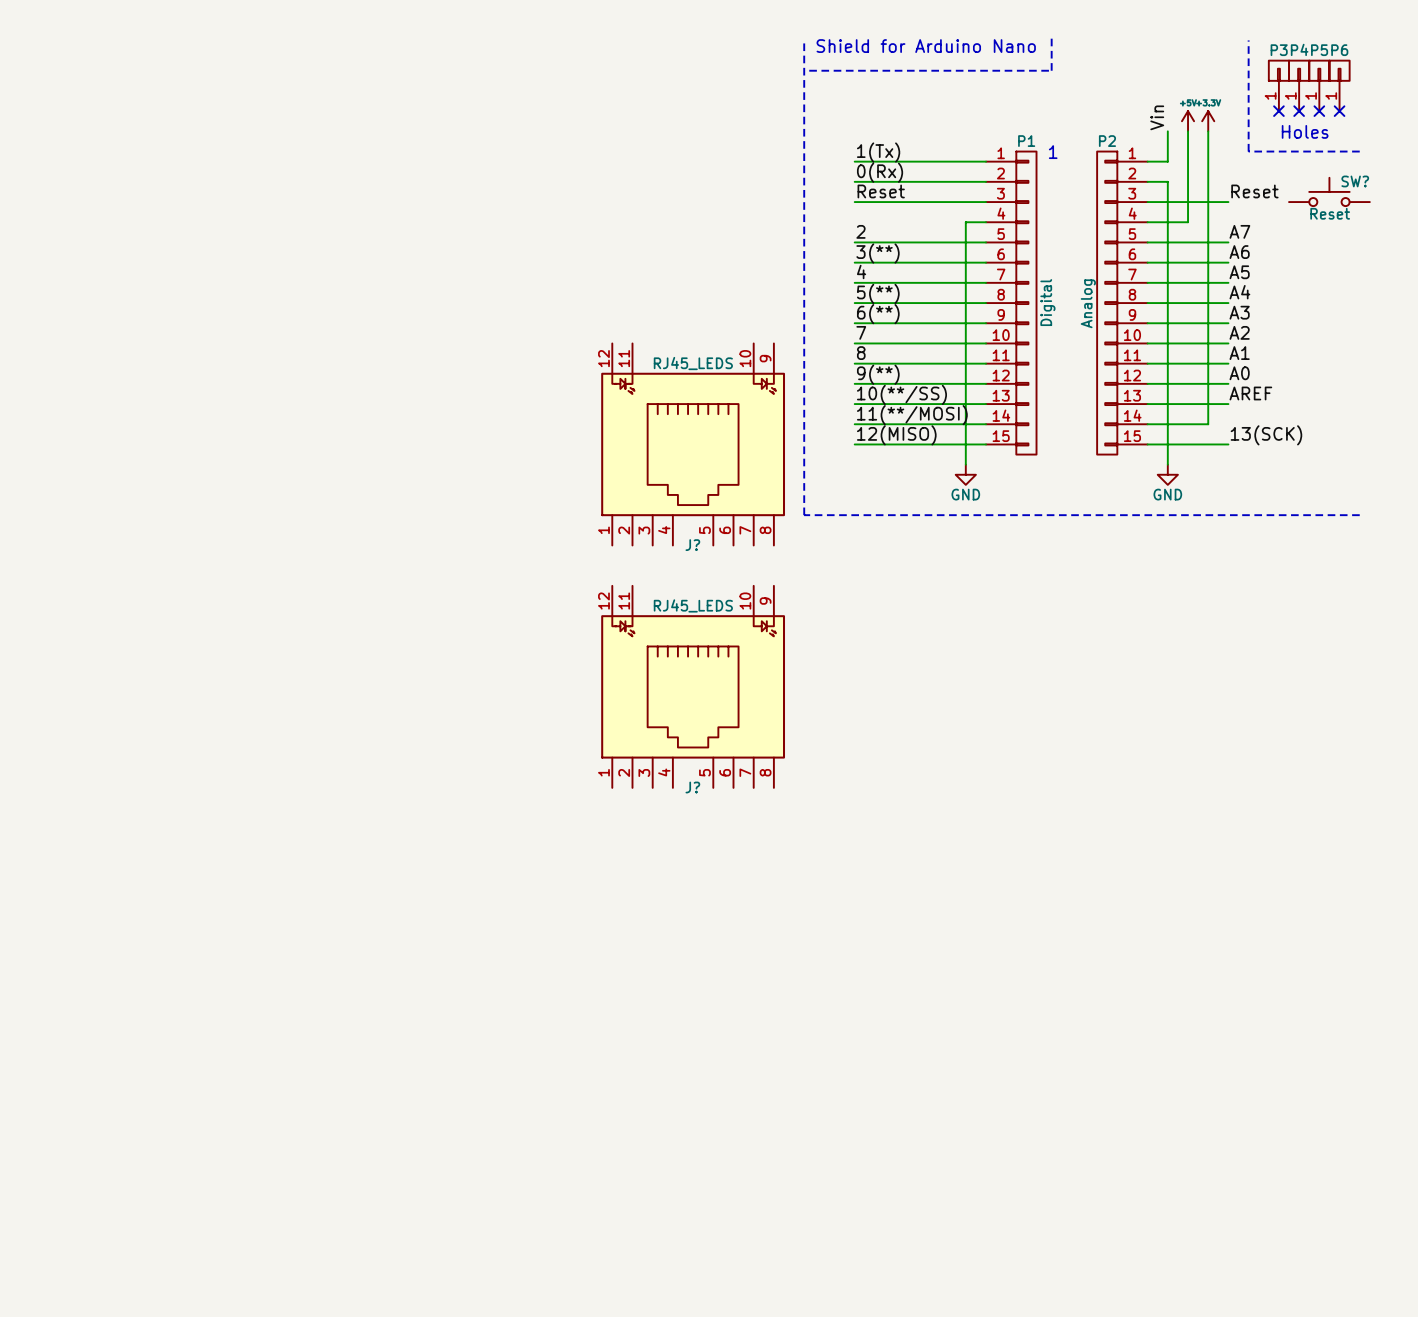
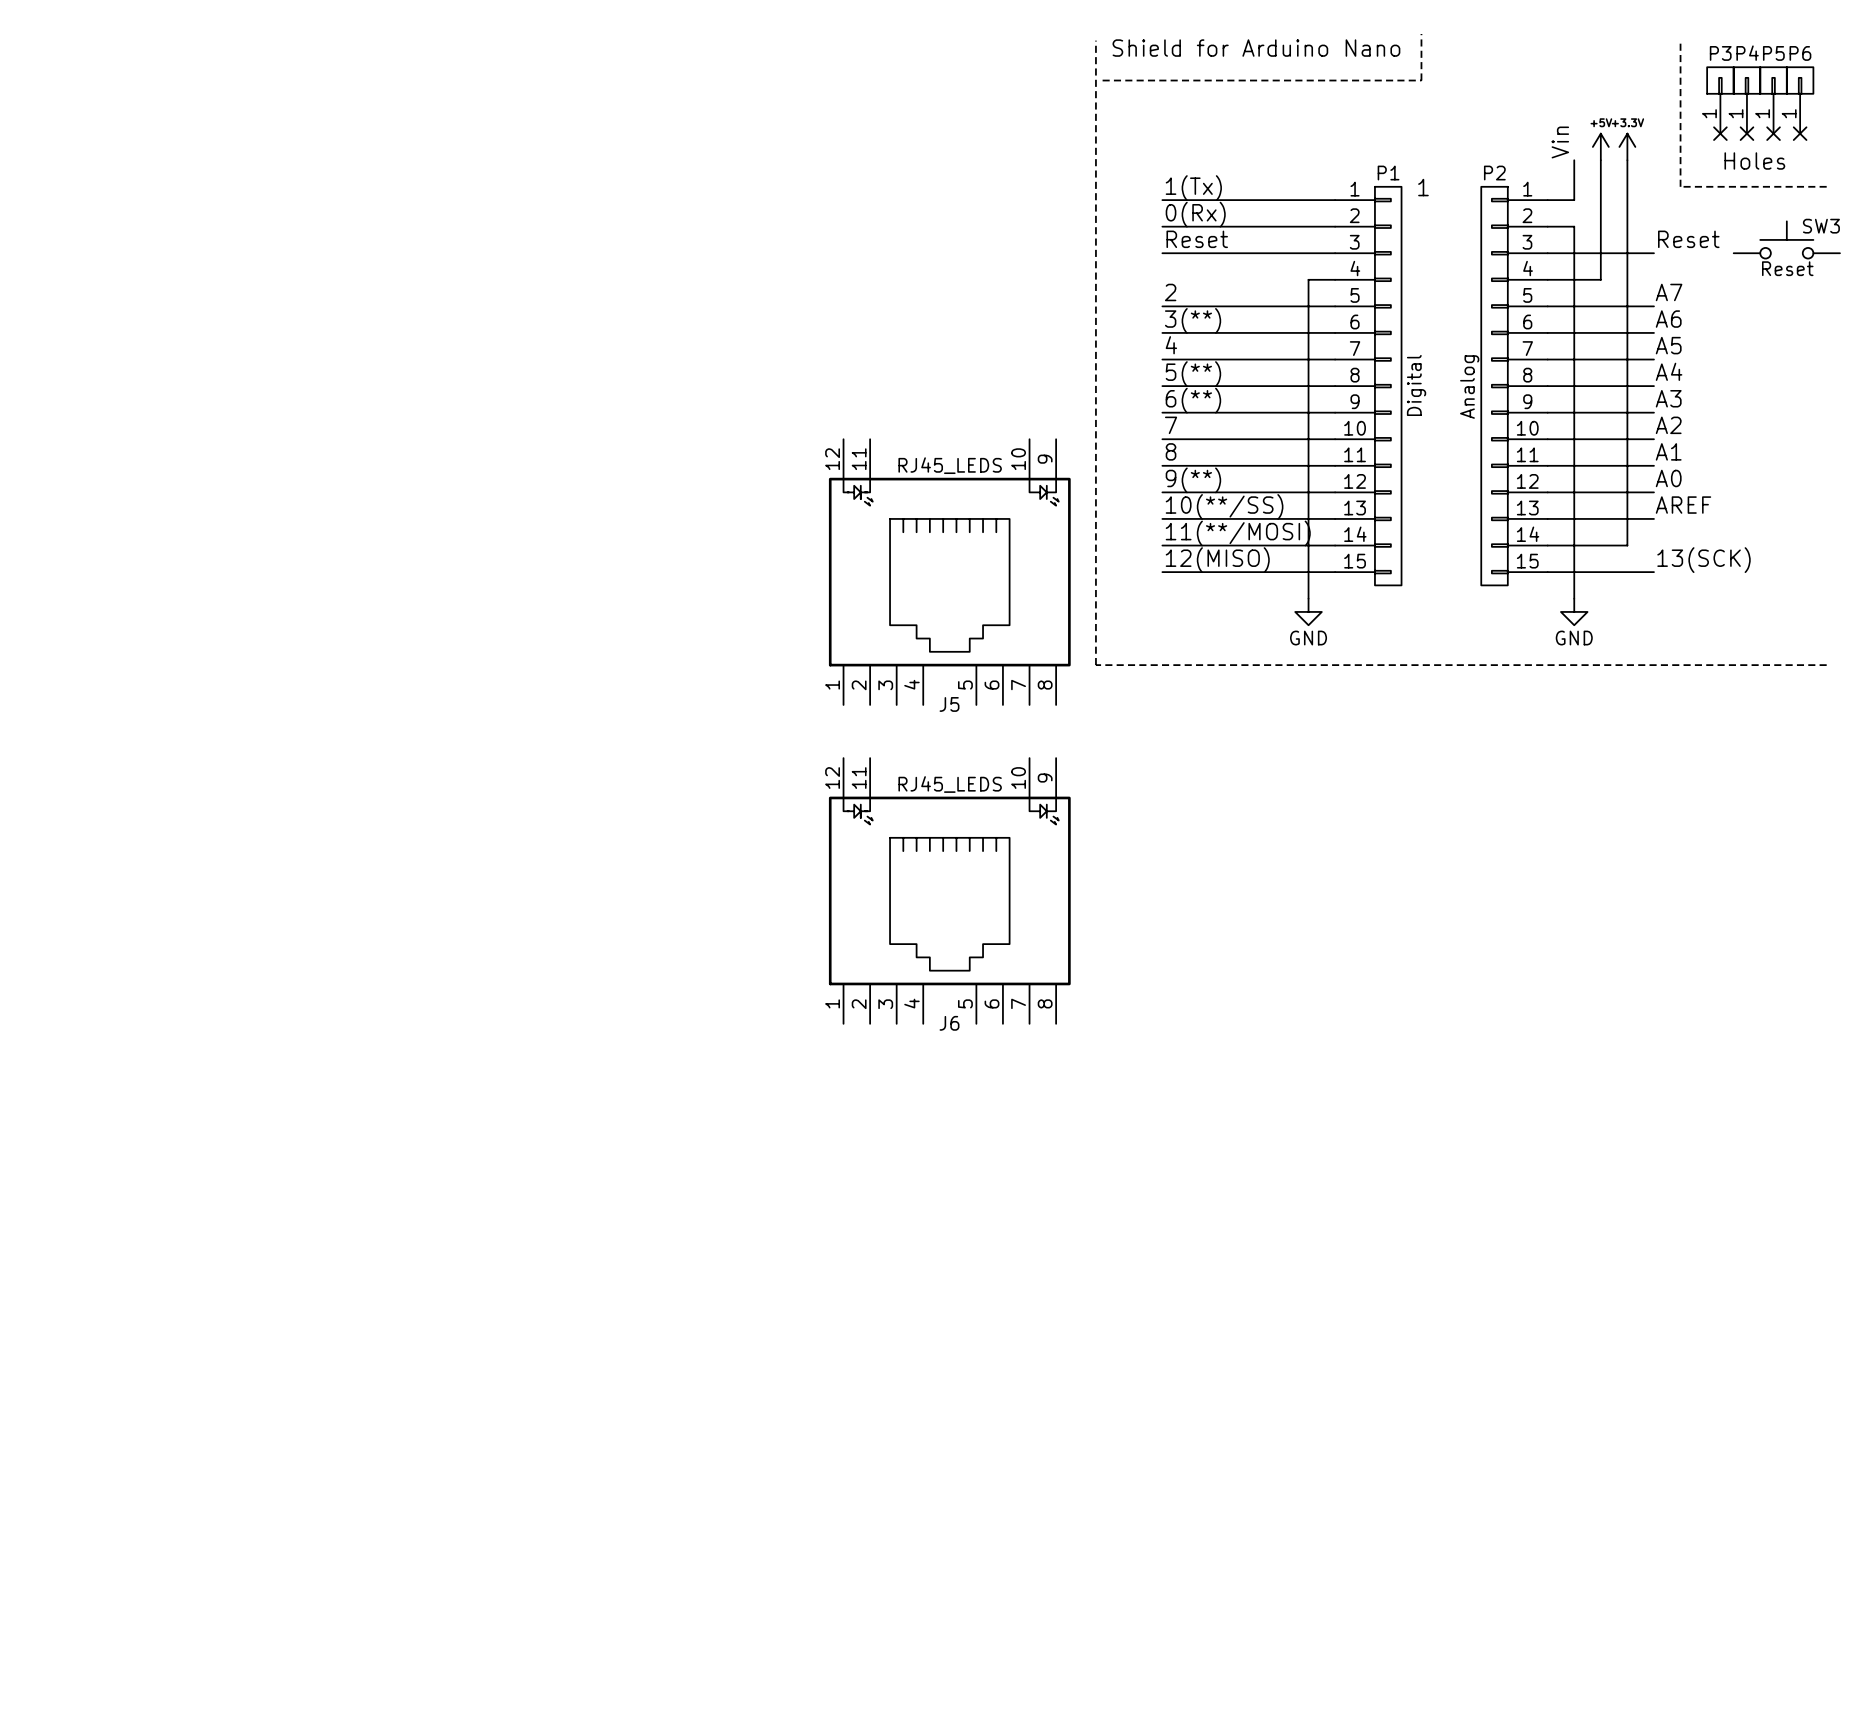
SW? name: SW? (1355, 181) -> SW3 (1821, 226)
J? name: J? (692, 545) -> J5 (949, 704)
J? name: J? (692, 787) -> J6 (949, 1023)

